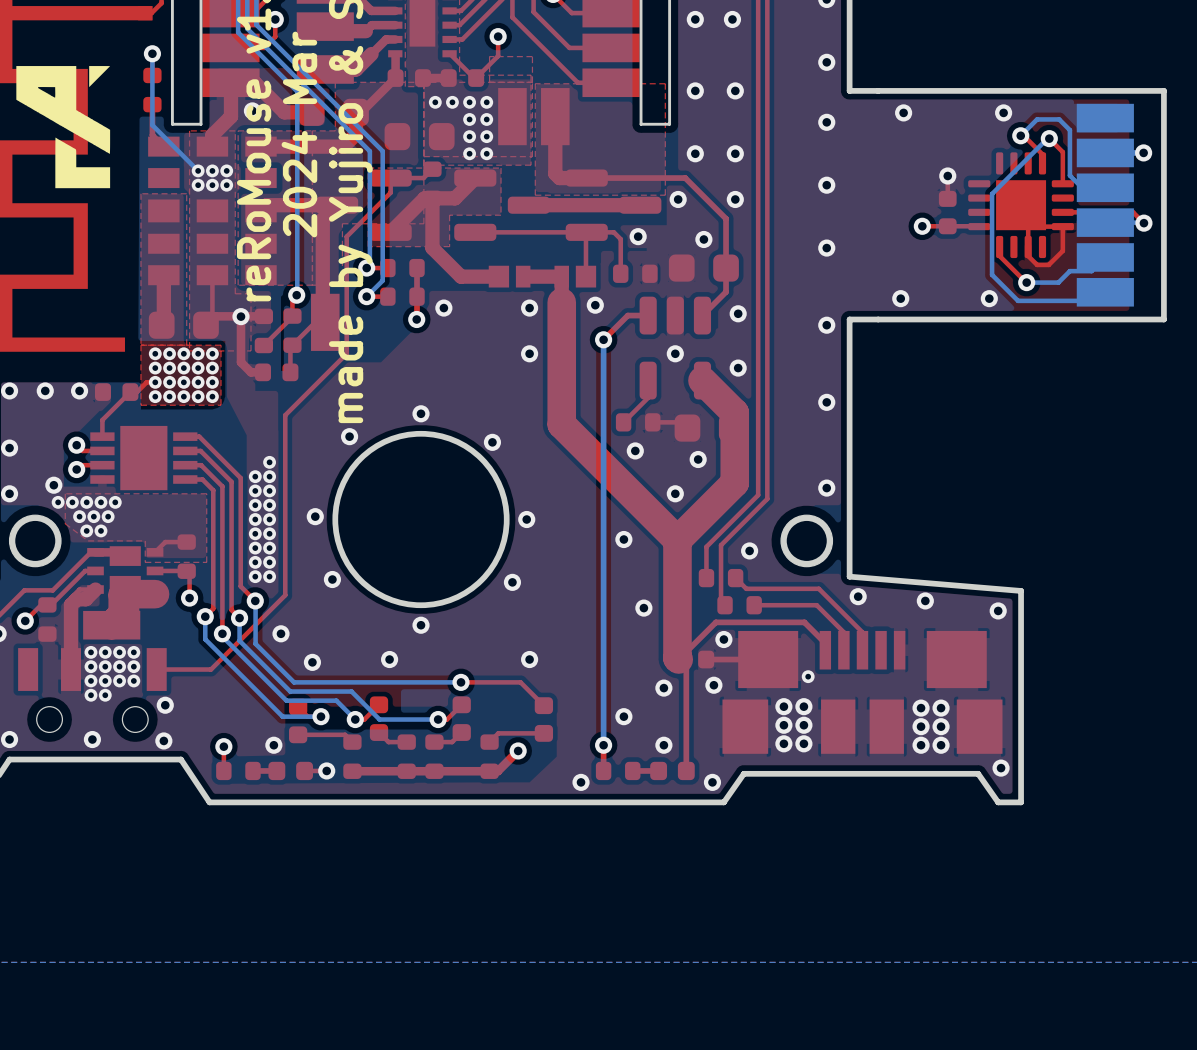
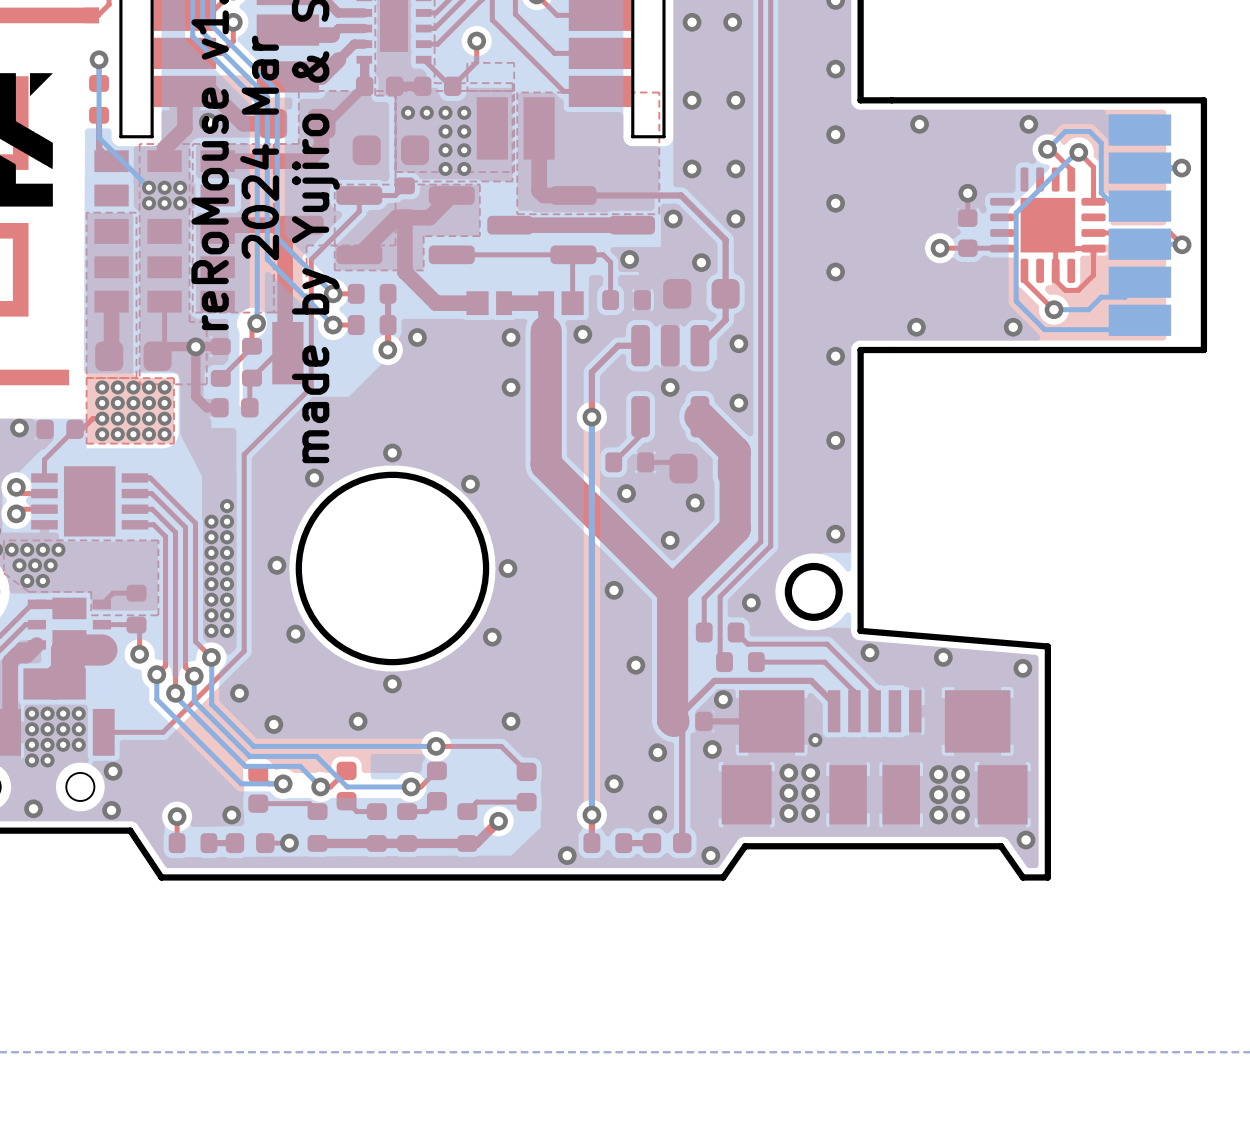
bottom track: (256, 23) (382, 151) (382, 280) (366, 296) -> (212, 26) (277, 91) (277, 237) (333, 293)
bottom track: (306, 87) (369, 151) (369, 264) (366, 268) -> (267, 96) (267, 259) (333, 325)
top track: none -> (591, 372) (591, 417)
bottom track: (603, 339) (603, 380) -> none
via position: (603, 339) -> (591, 417)

